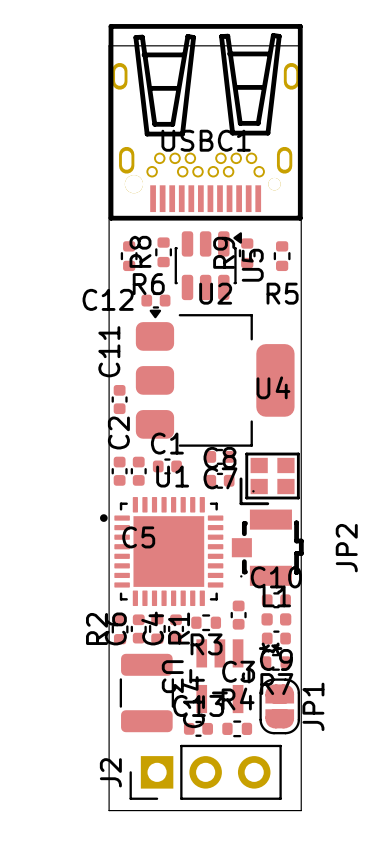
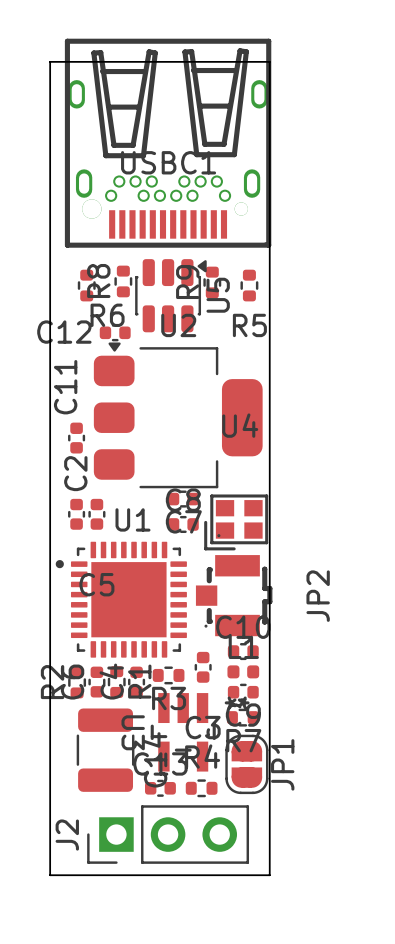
board edge: (109, 45) (109, 810) -> (65, 61) (50, 61) (50, 875) (65, 875)
C1: (167, 466) -> none

